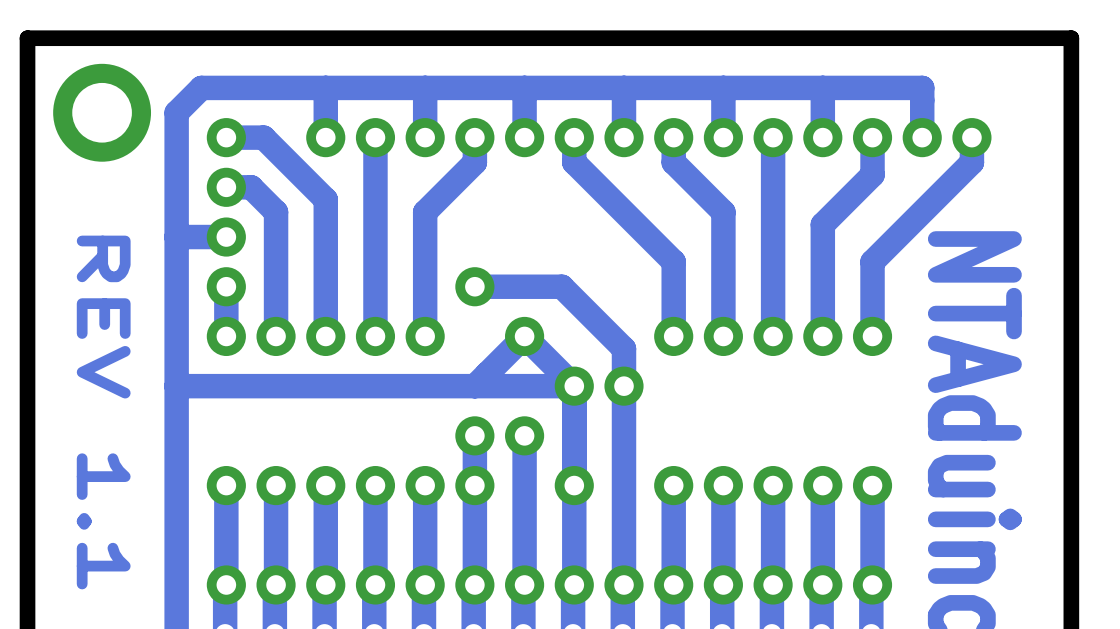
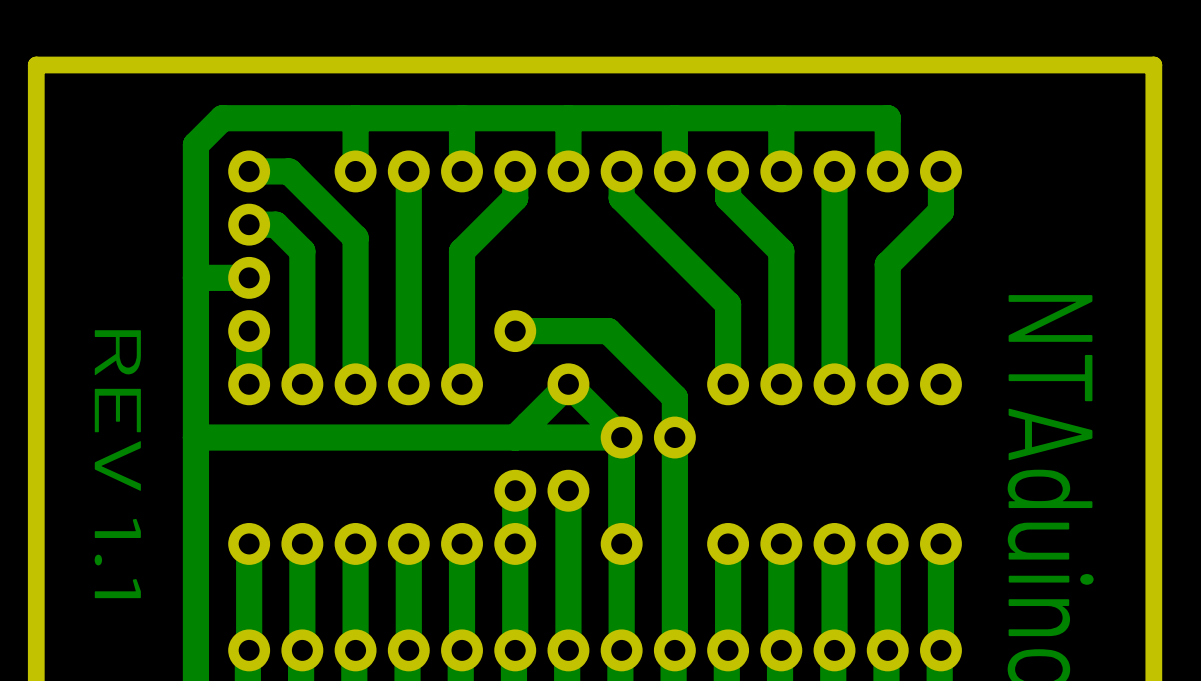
bottom track: (822, 87) (922, 87) (922, 137) -> none
part: (102, 112) -> none
part: (947, 137) -> none
bottom track: (971, 137) (971, 162) (872, 261) (872, 336) -> none

